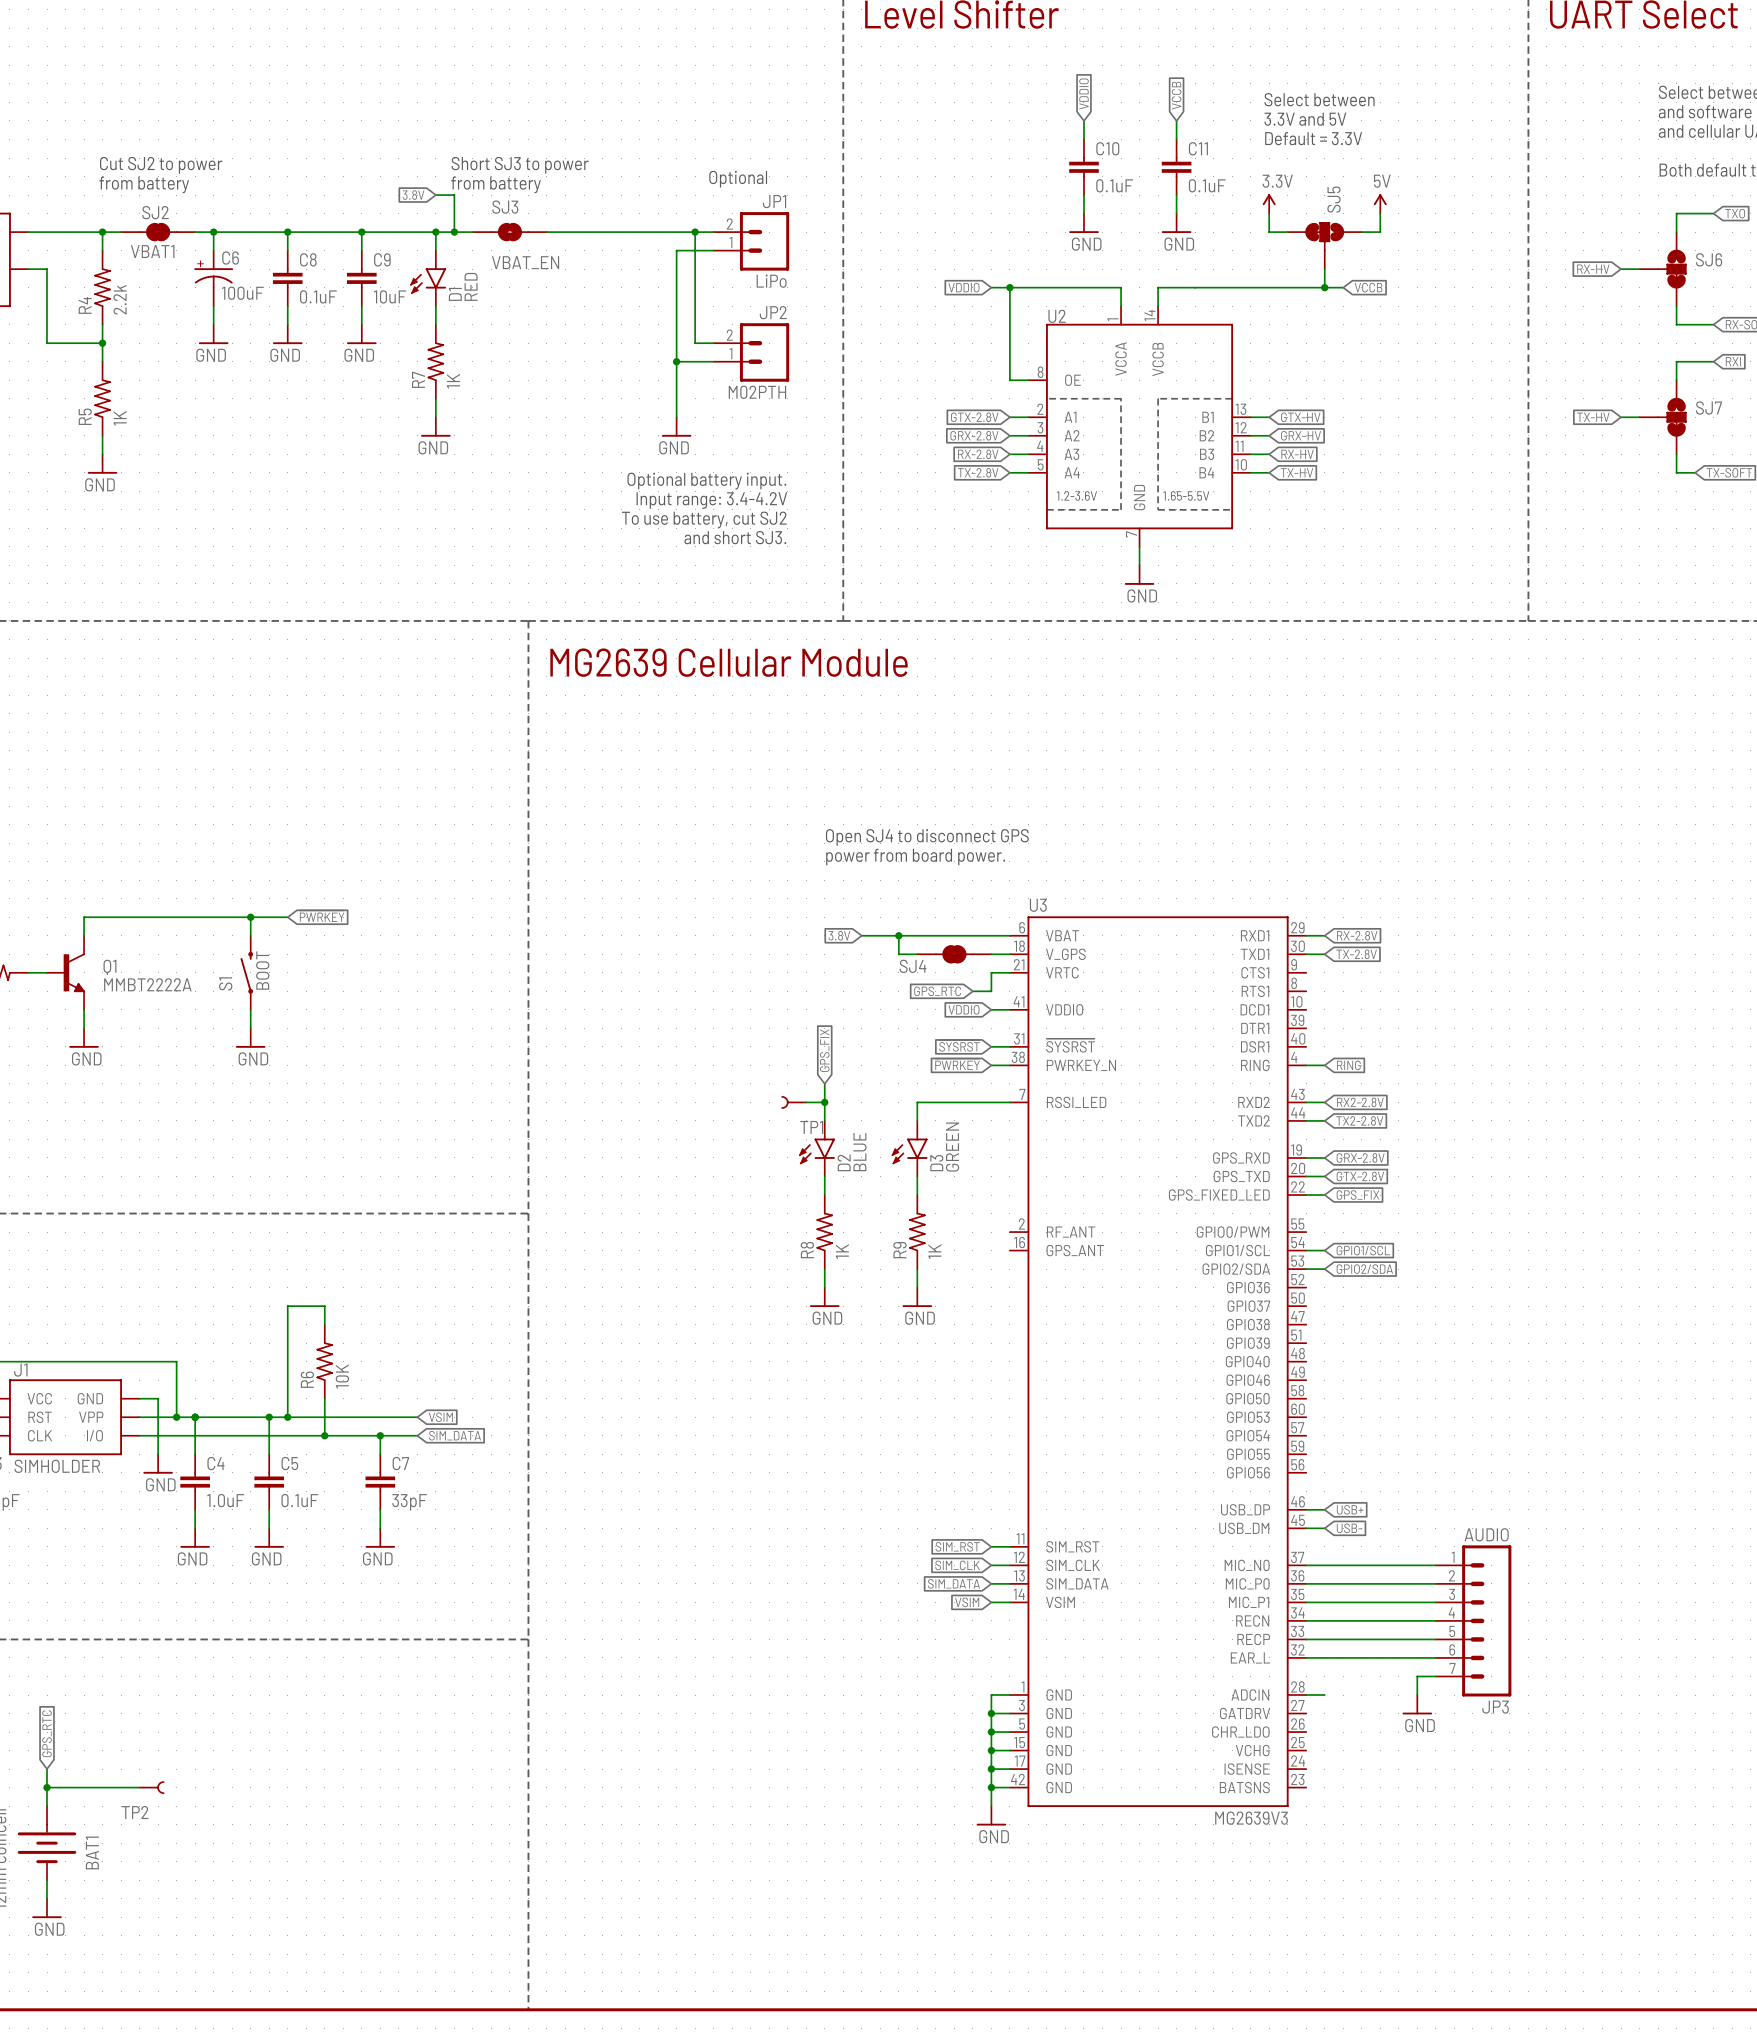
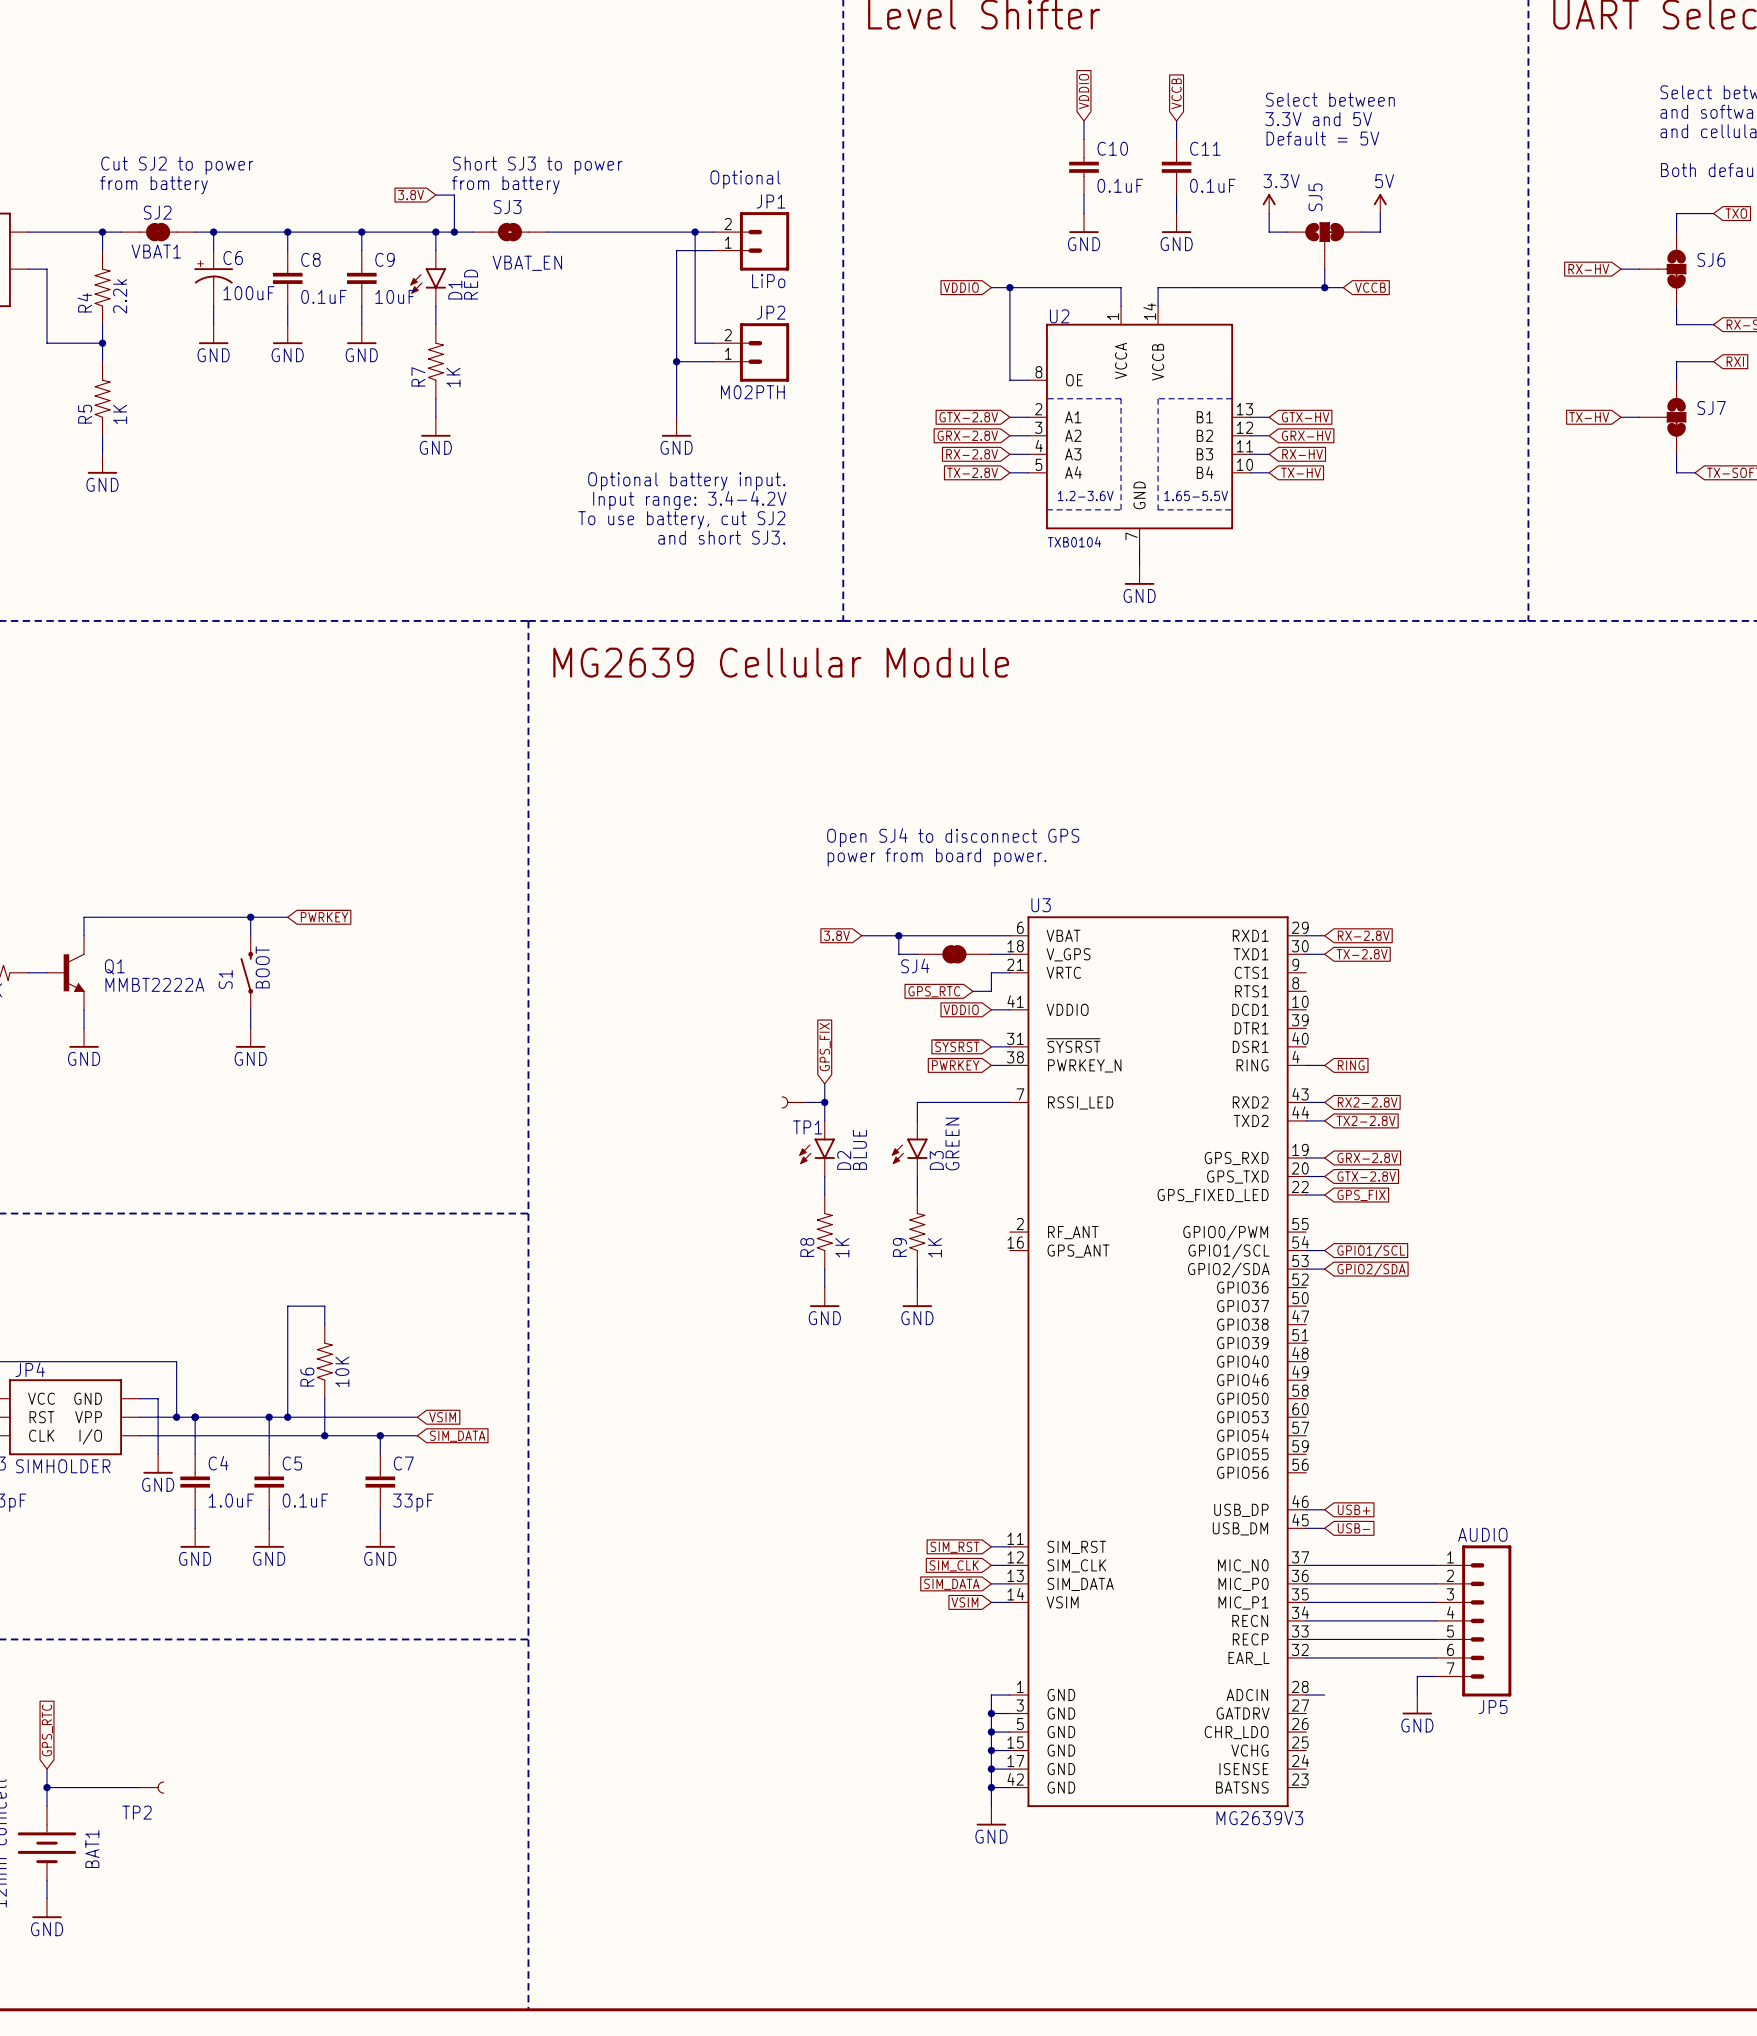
text: Default = 3.3V (1313, 138) -> Default = 5V (1322, 138)
SJ5 flip: as is (1324, 236) -> left-right (1324, 236)
U2 value: none -> TXB0104 (1074, 542)
J1 name: J1 (20, 1370) -> JP4 (30, 1369)
JP3 name: JP3 (1495, 1707) -> JP5 (1493, 1707)

